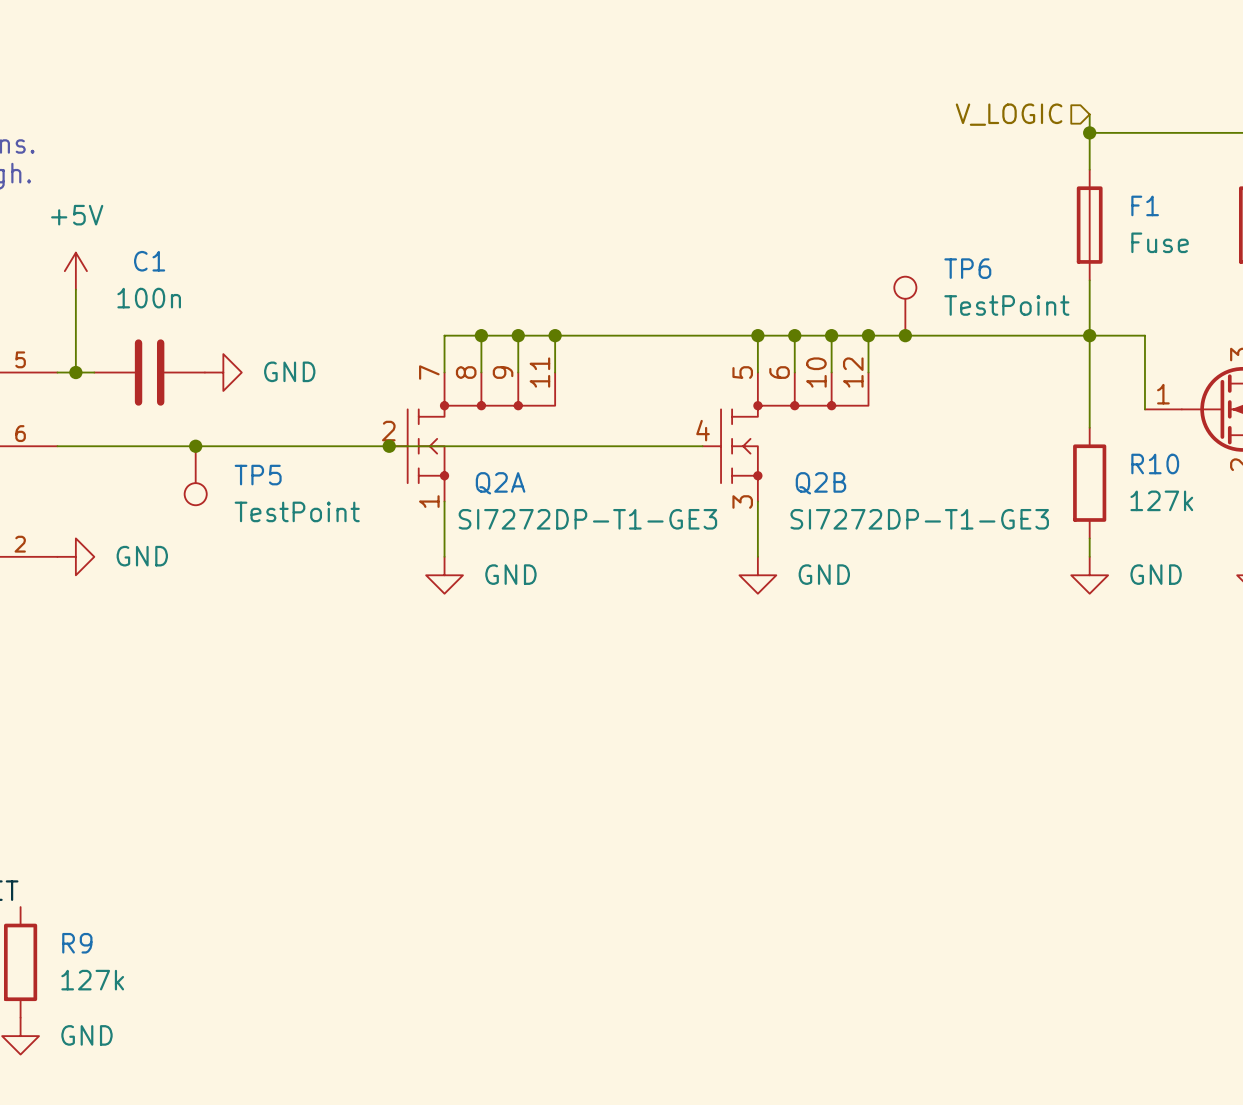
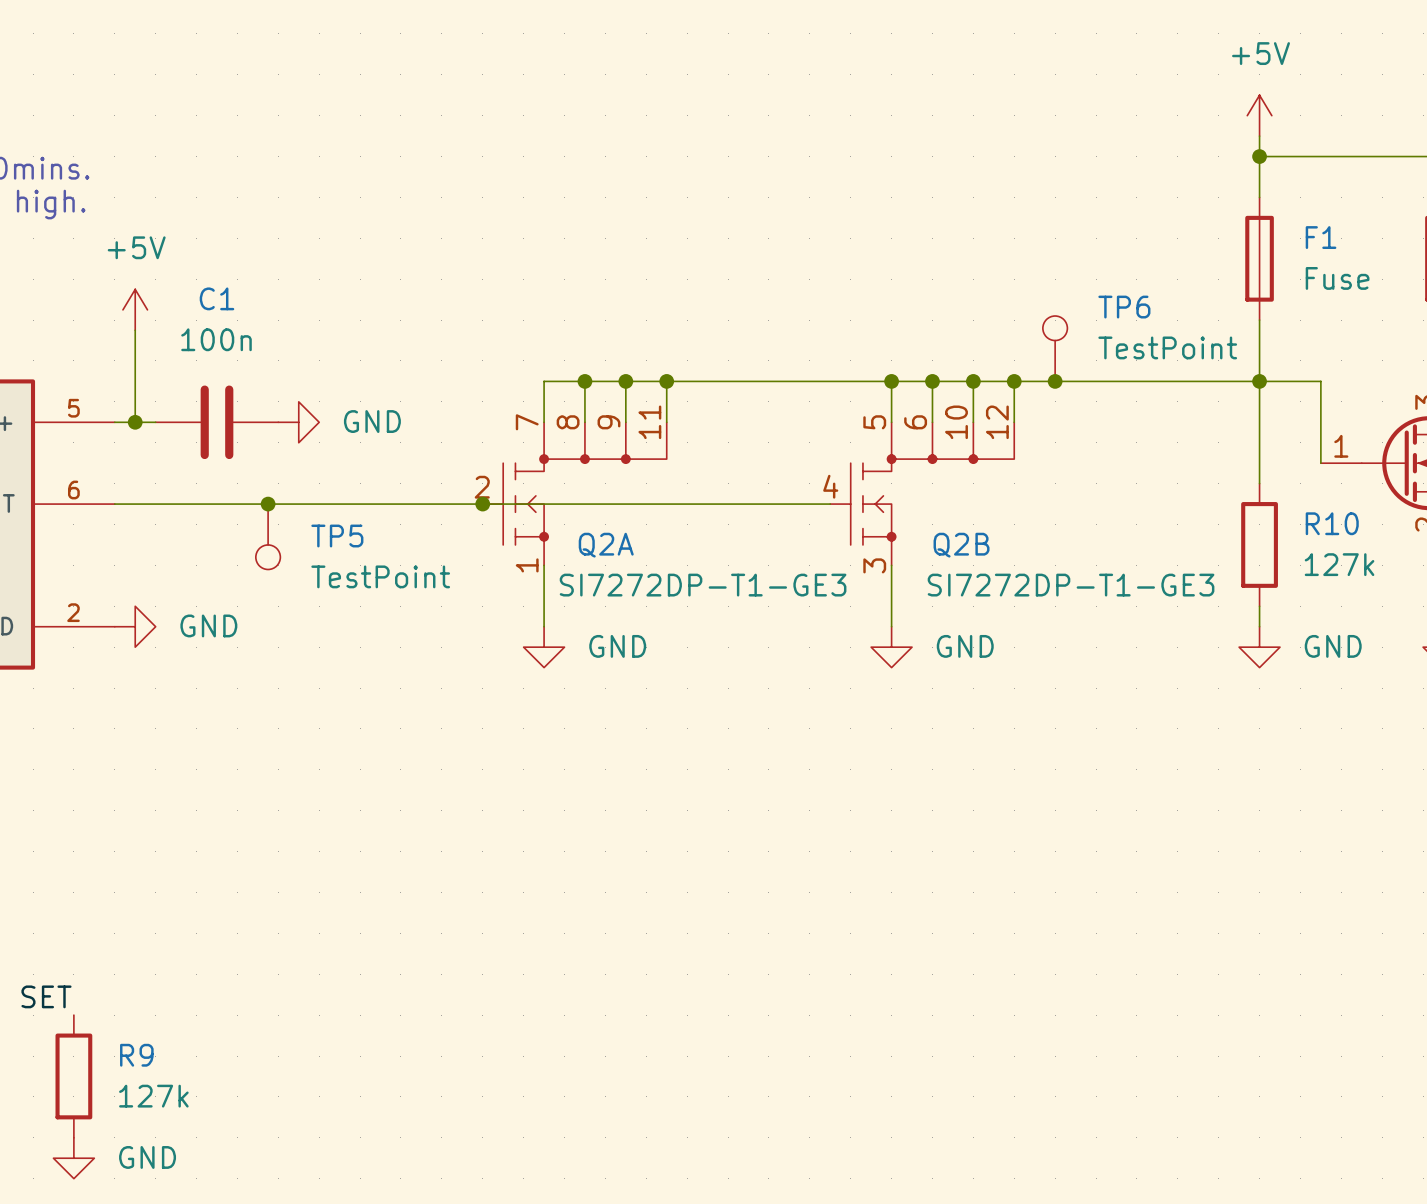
power symbol: none -> +5V (1259, 115)
hierarchical label: V_LOGIC (1009, 114) -> none

